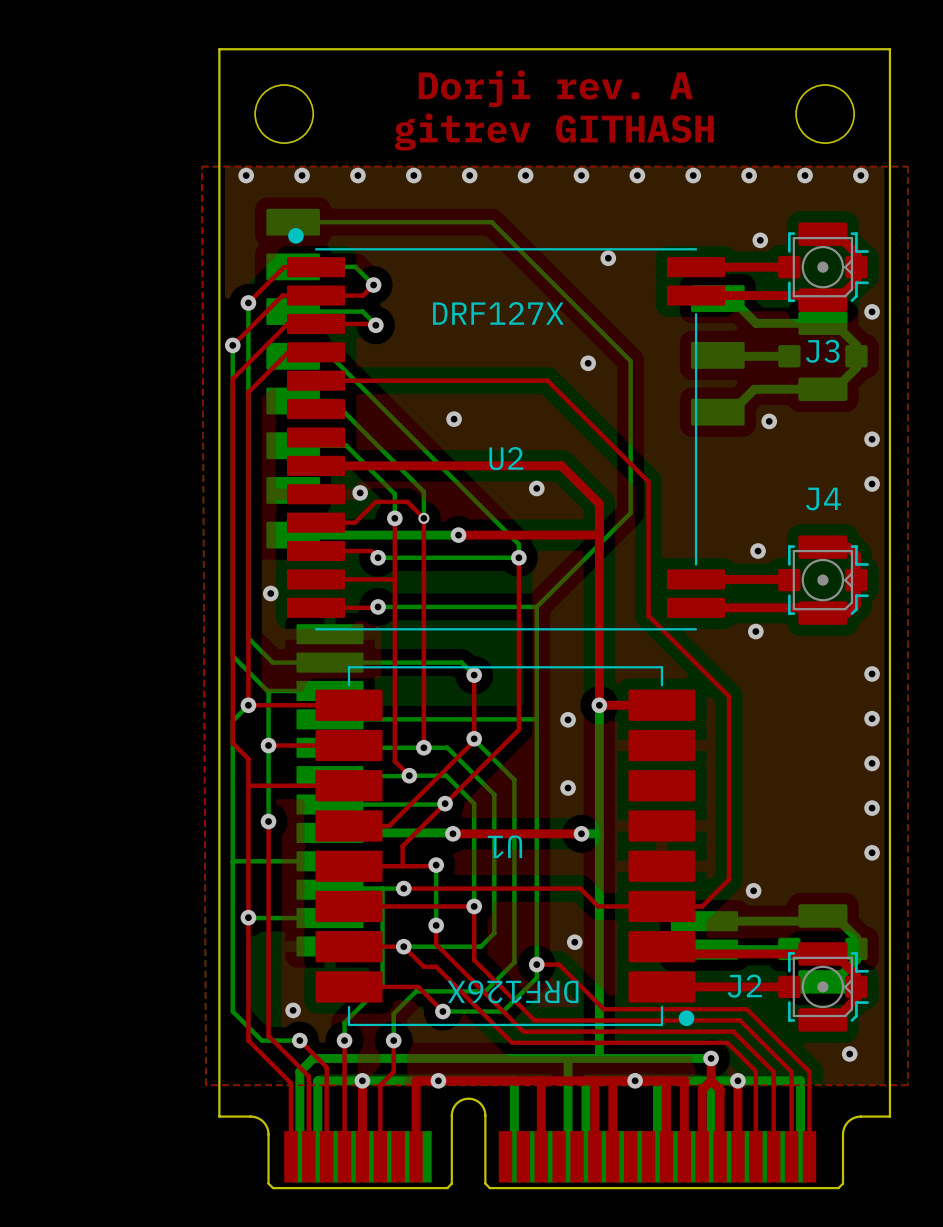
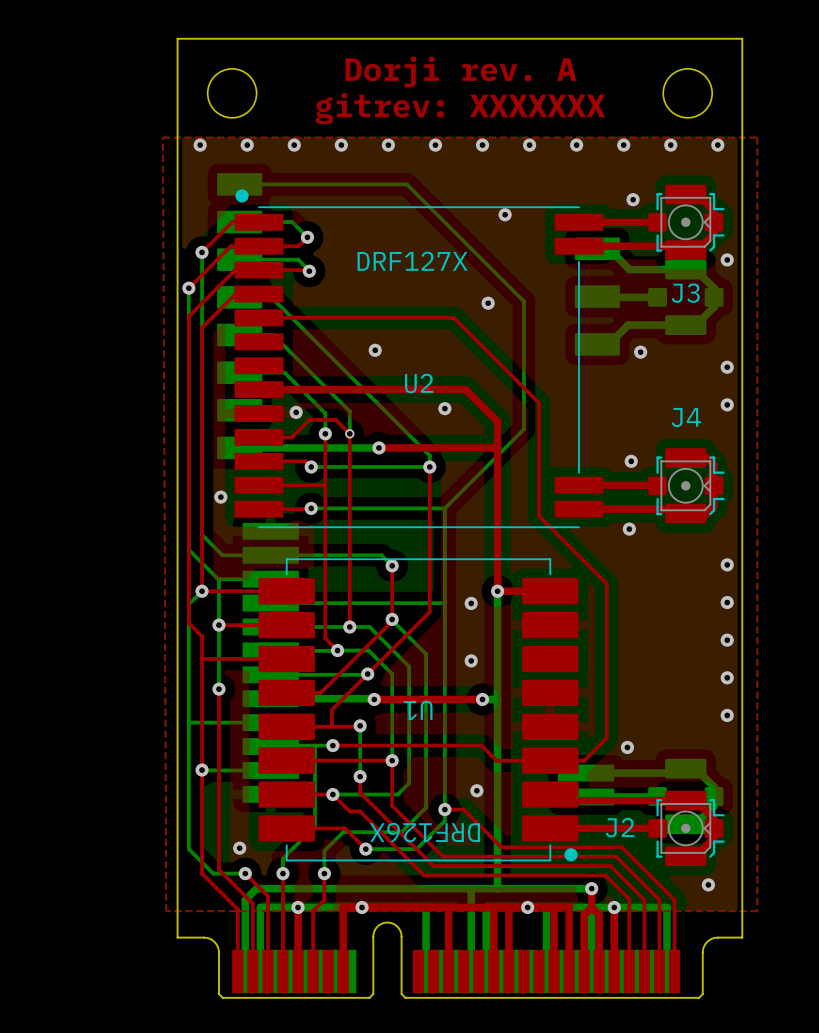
text: gitrev GITHASH (554, 132) -> gitrev: XXXXXXX (460, 108)

